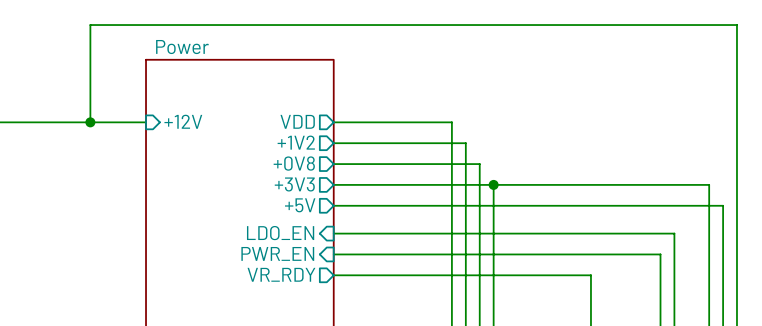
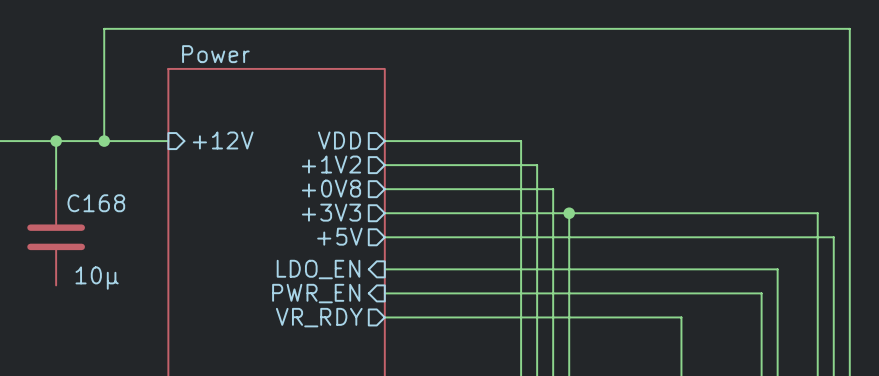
wire: none -> (56, 141) (56, 189)
junction: none -> (56, 141)
C168: none -> 10µ (56, 237)

